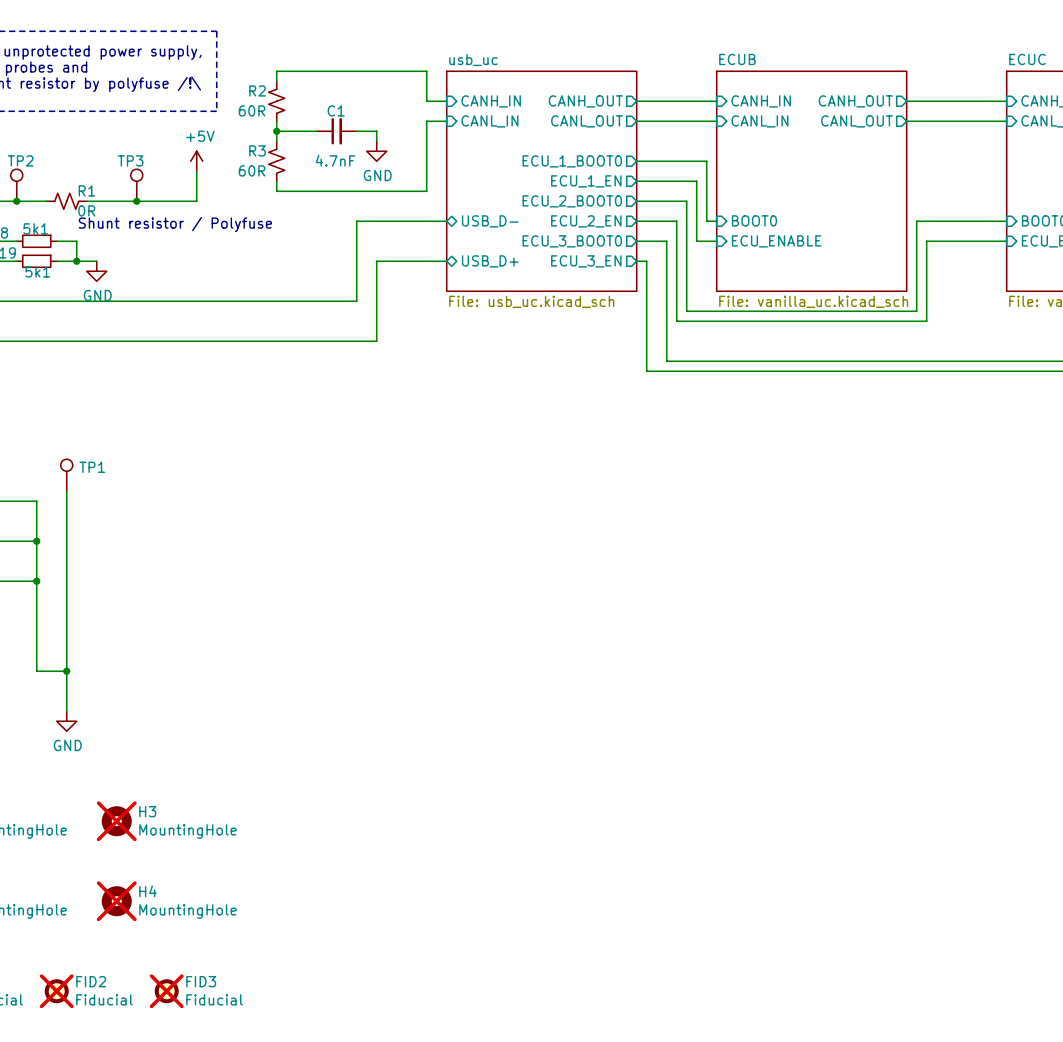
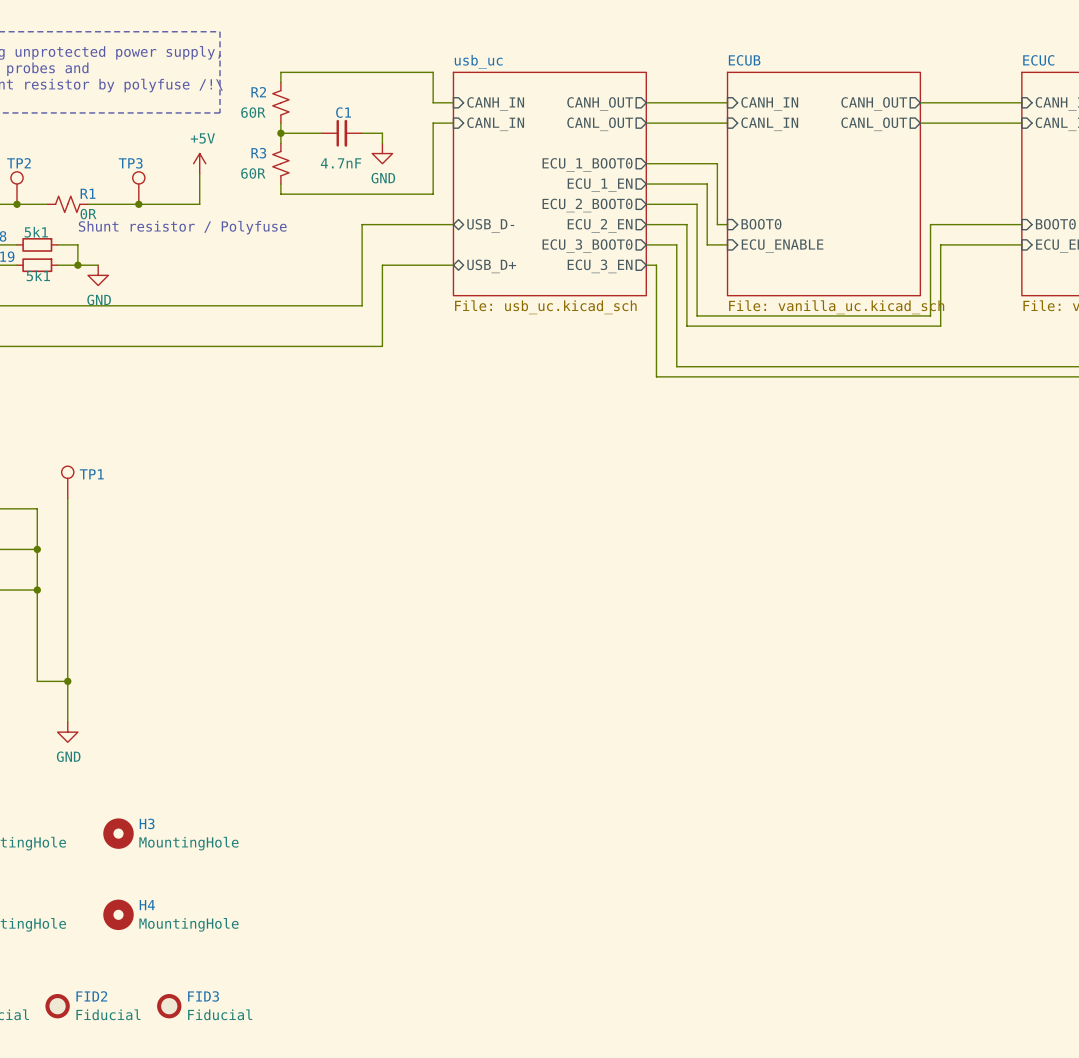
H3 do-not-place cross: (116, 821) -> none
H4 do-not-place cross: (116, 901) -> none
FID2 do-not-place cross: (56, 991) -> none
FID3 do-not-place cross: (166, 991) -> none

